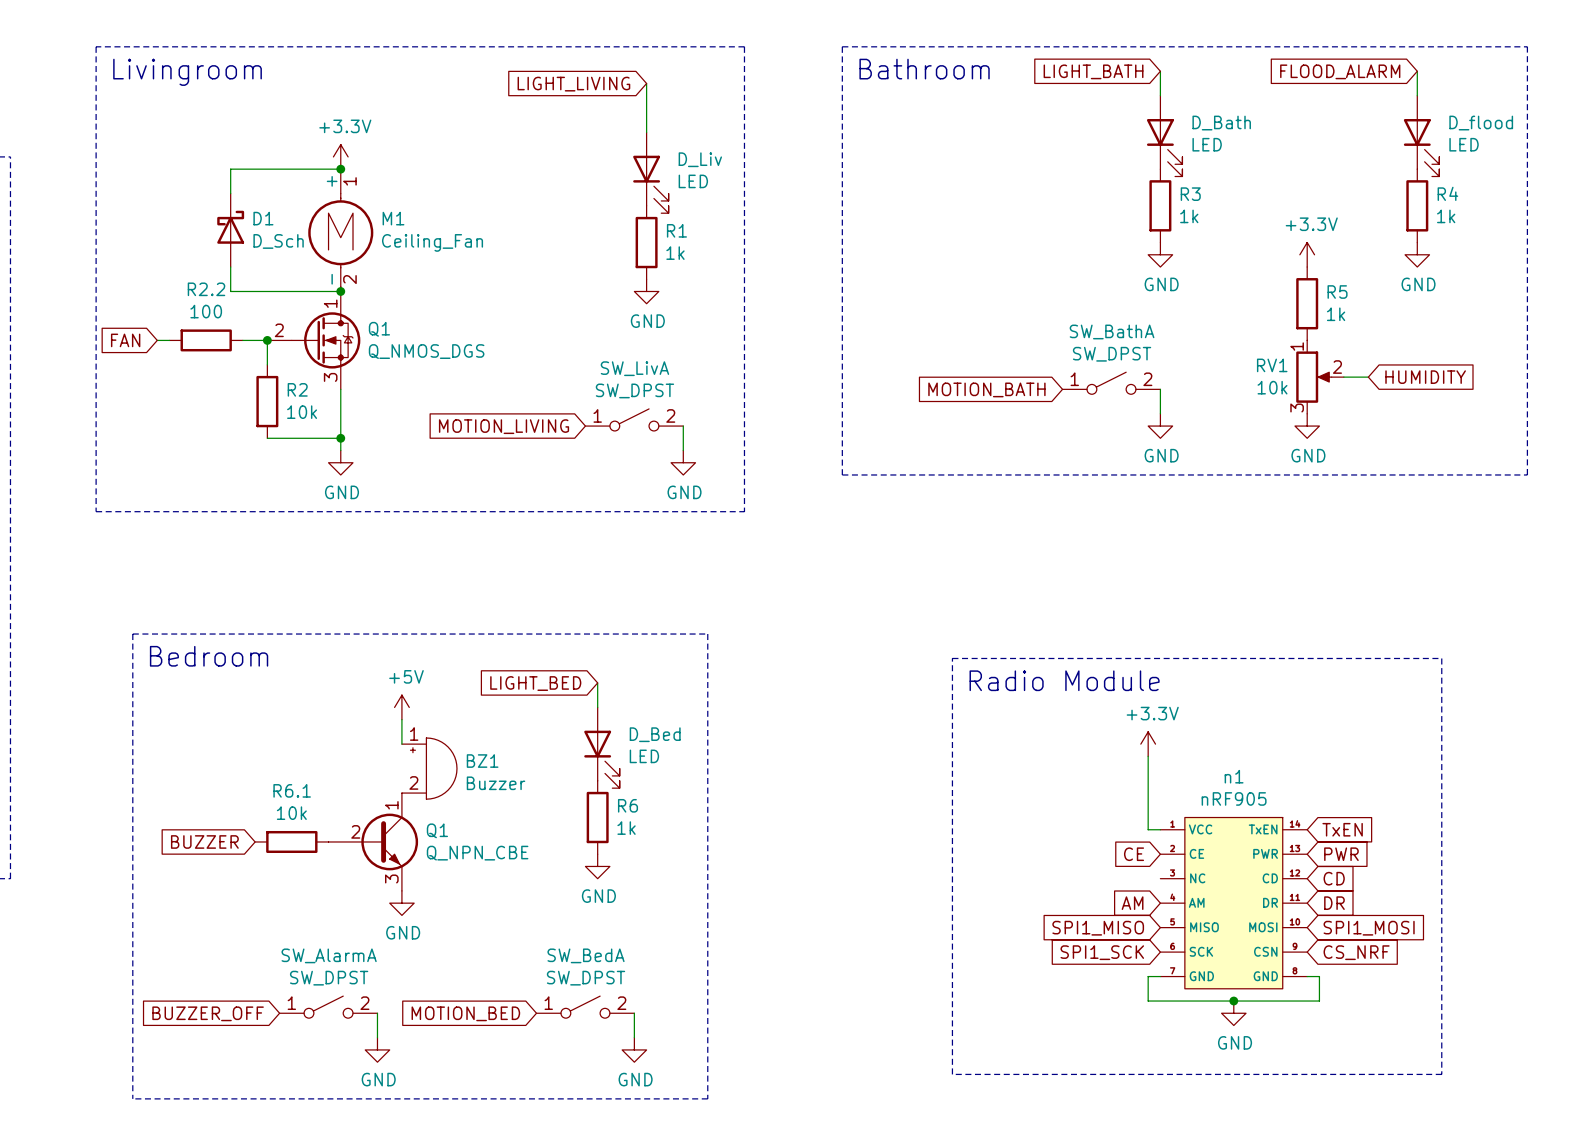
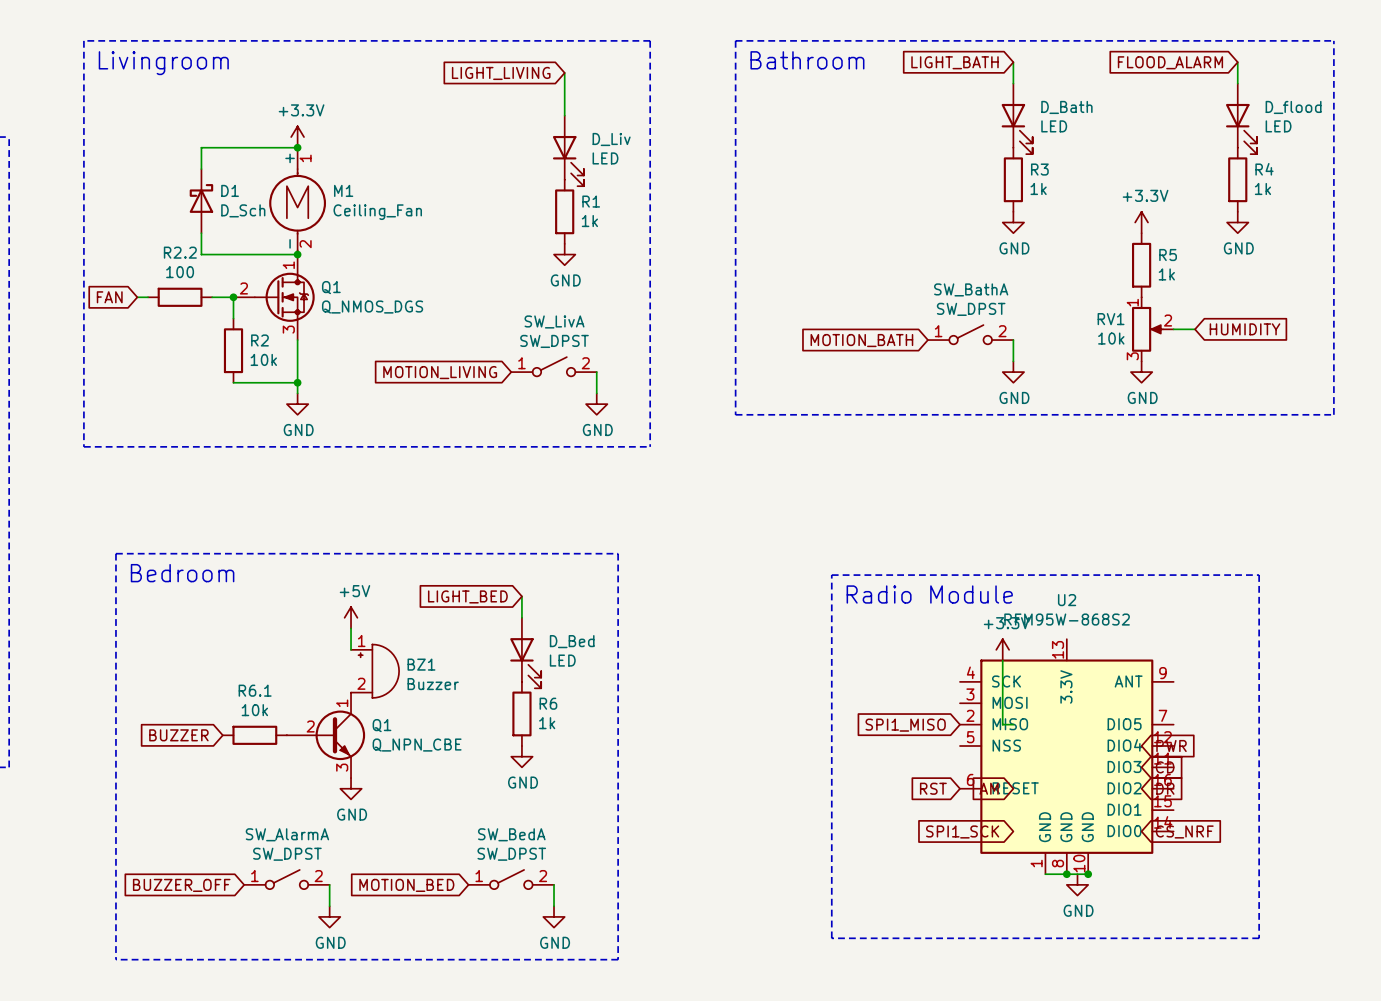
global label: TxEN (1342, 829) -> none
global label: CE (1134, 854) -> none
U2: none -> RFM95W-868S2 (1066, 756)
global label: none -> RST (933, 788)
n1: nRF905 (1233, 903) -> none
global label position: SPI1_MISO (1098, 928) -> SPI1_MISO (905, 725)
global label: SPI1_MOSI (1369, 928) -> none
wire: (1160, 976) (1148, 976) (1148, 1001) (1197, 1001) -> none
wire: (1307, 976) (1319, 976) (1319, 1001) (1246, 1001) -> none
junction: none -> (1066, 874)
junction: (1233, 1001) -> none
junction: none -> (1088, 874)

